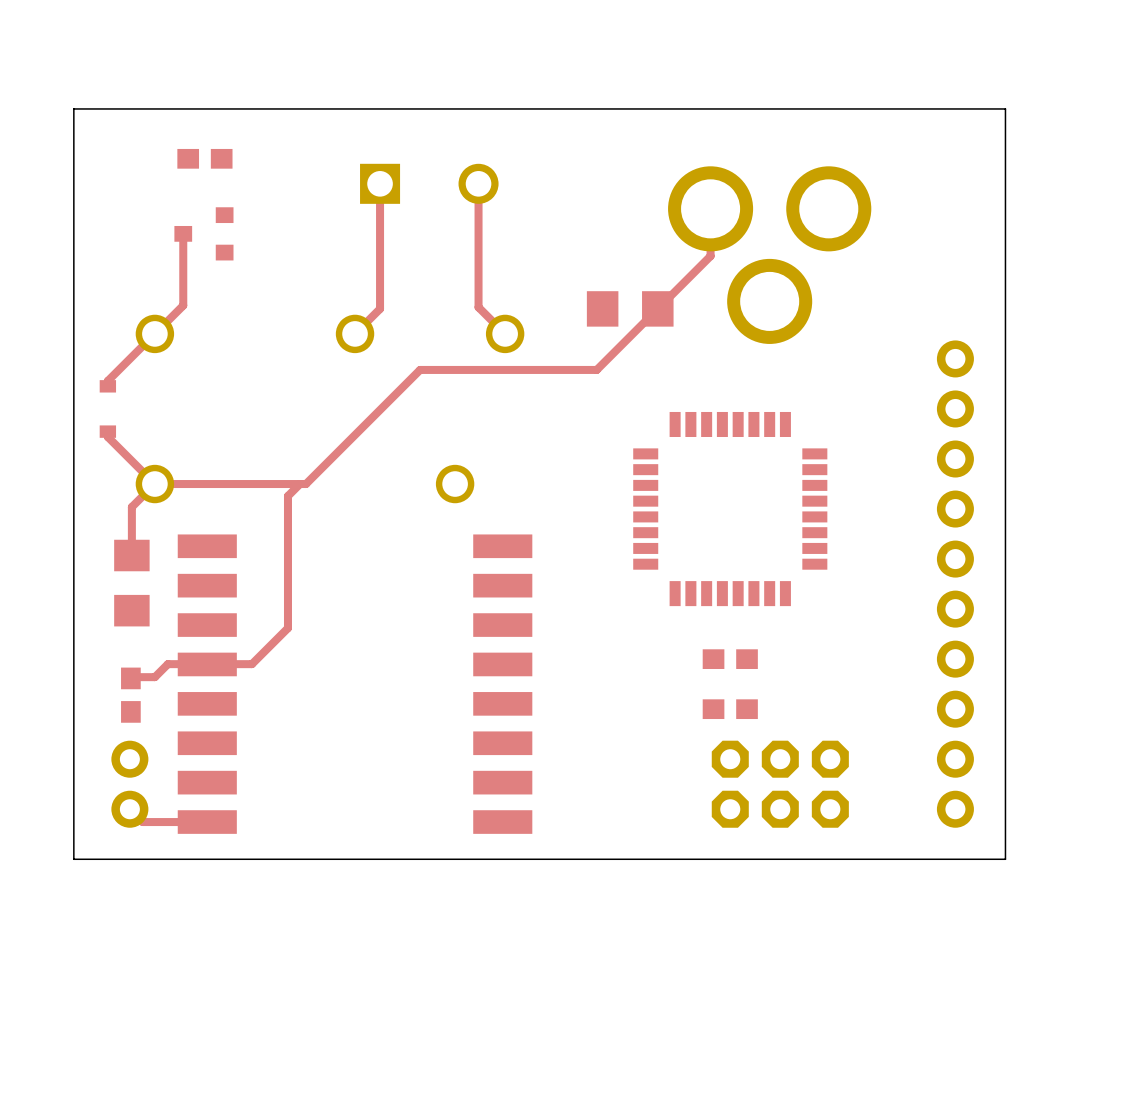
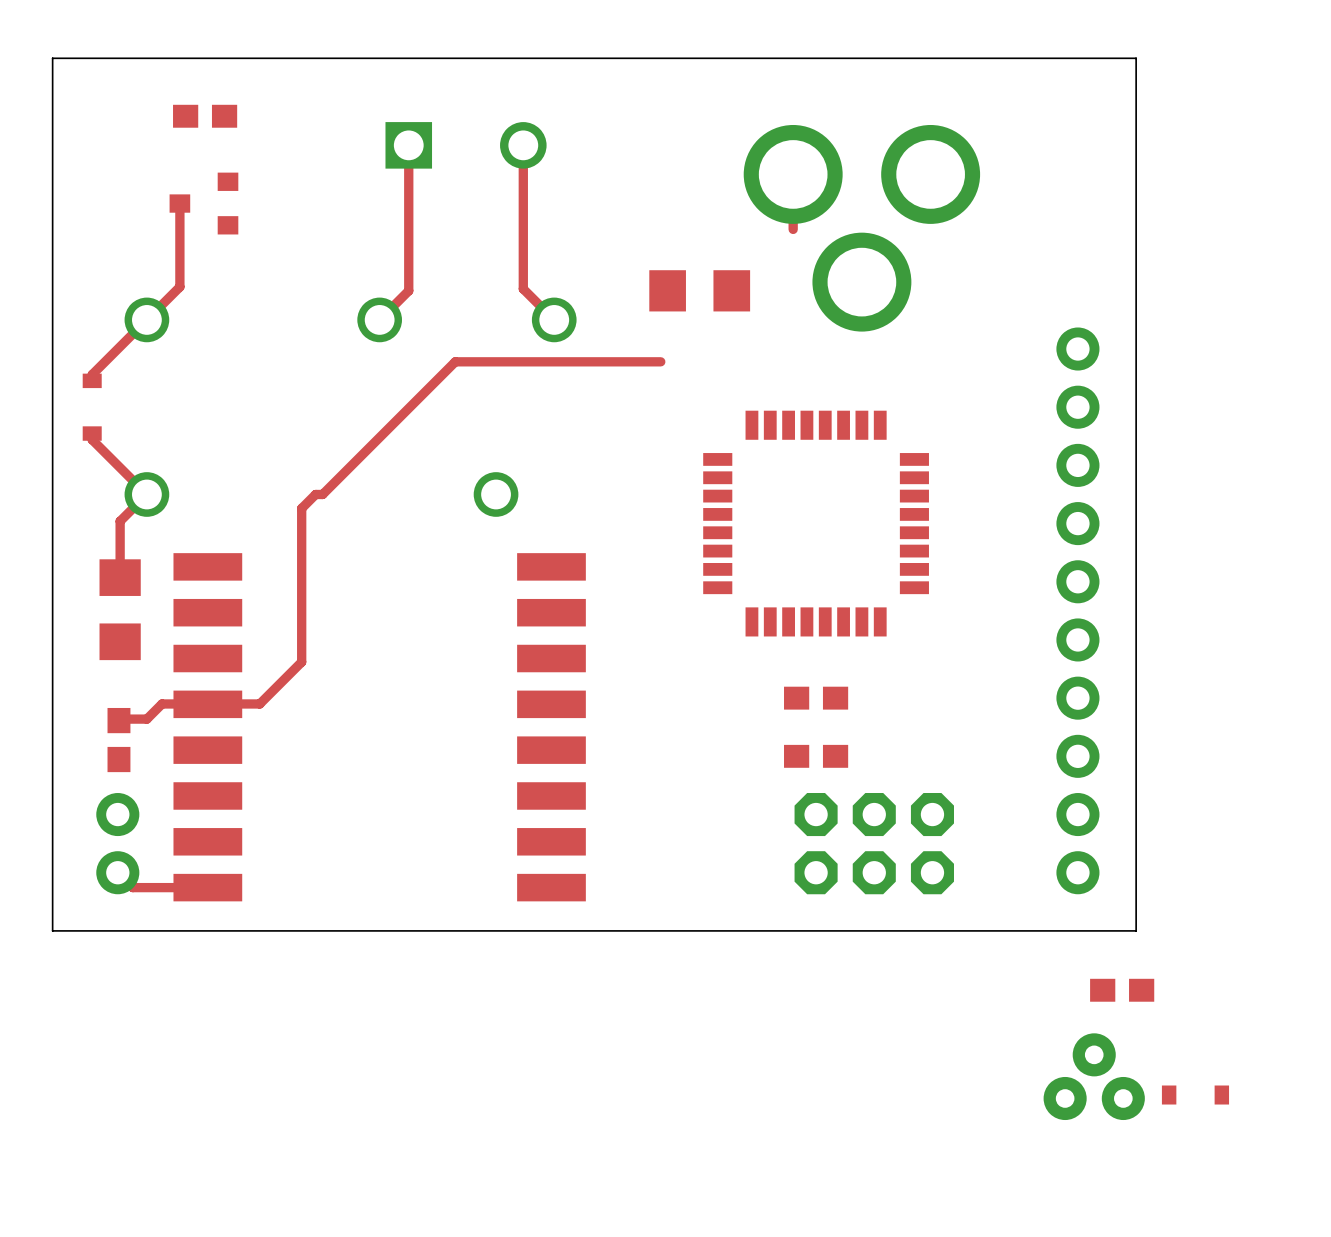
top track: (710, 256) (596, 369) -> none
top track: (299, 484) (154, 484) -> none
part: none -> (1122, 990)
part: none -> (1094, 1076)
part: none -> (1195, 1095)

